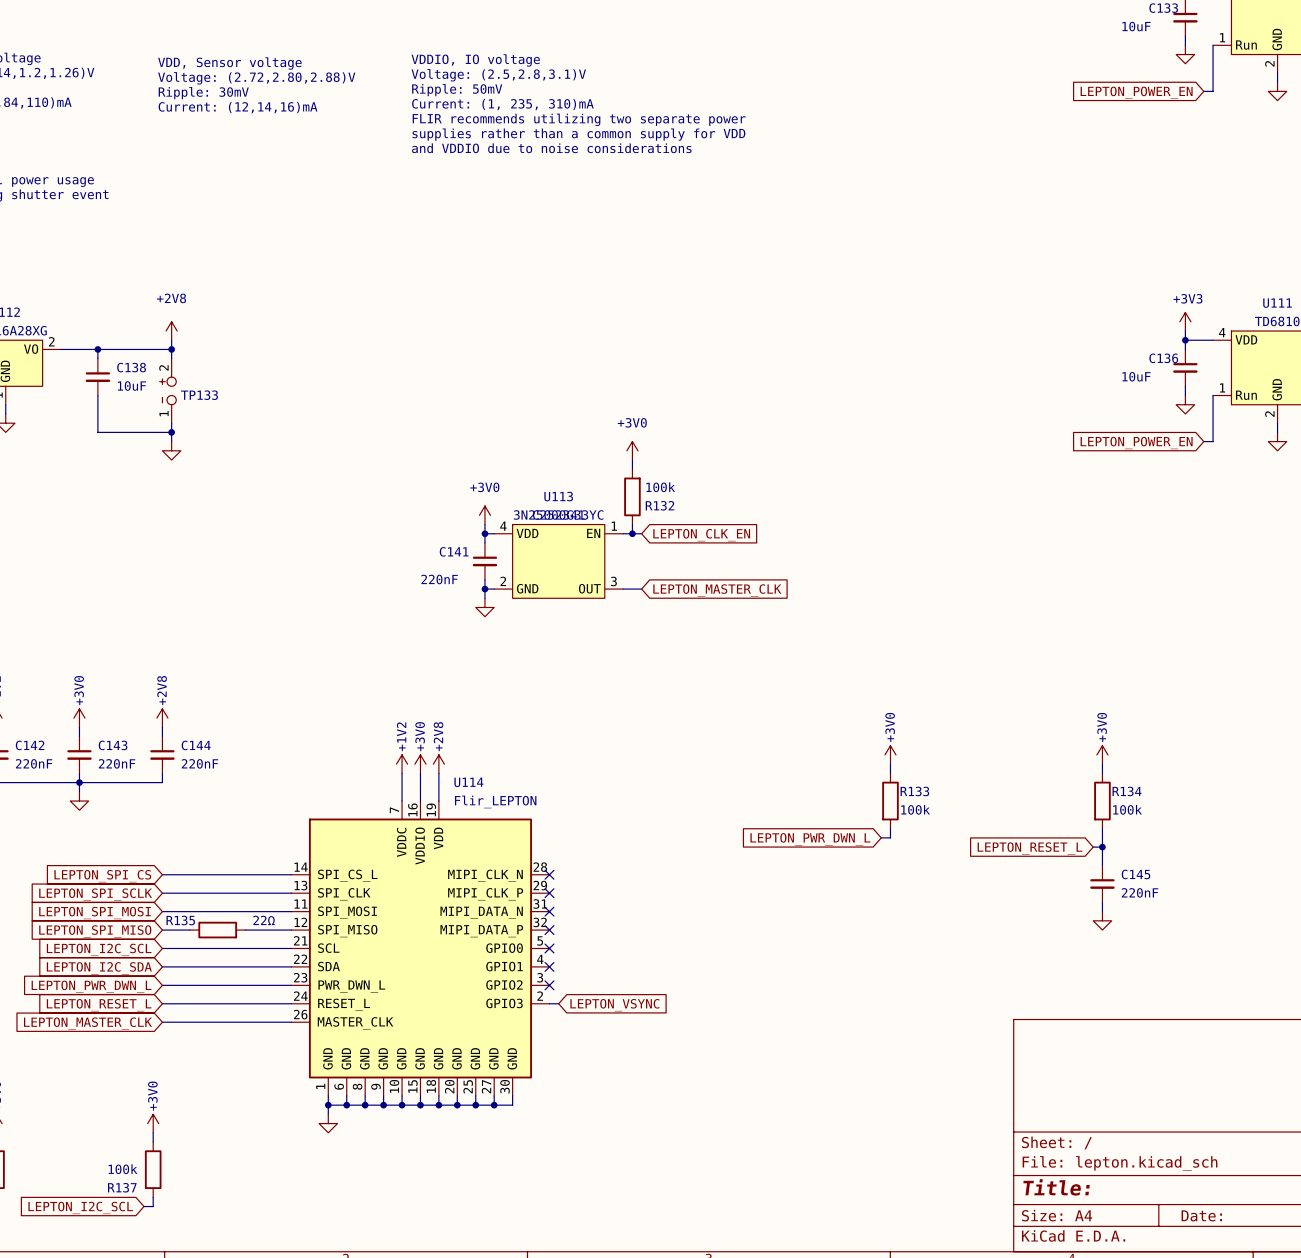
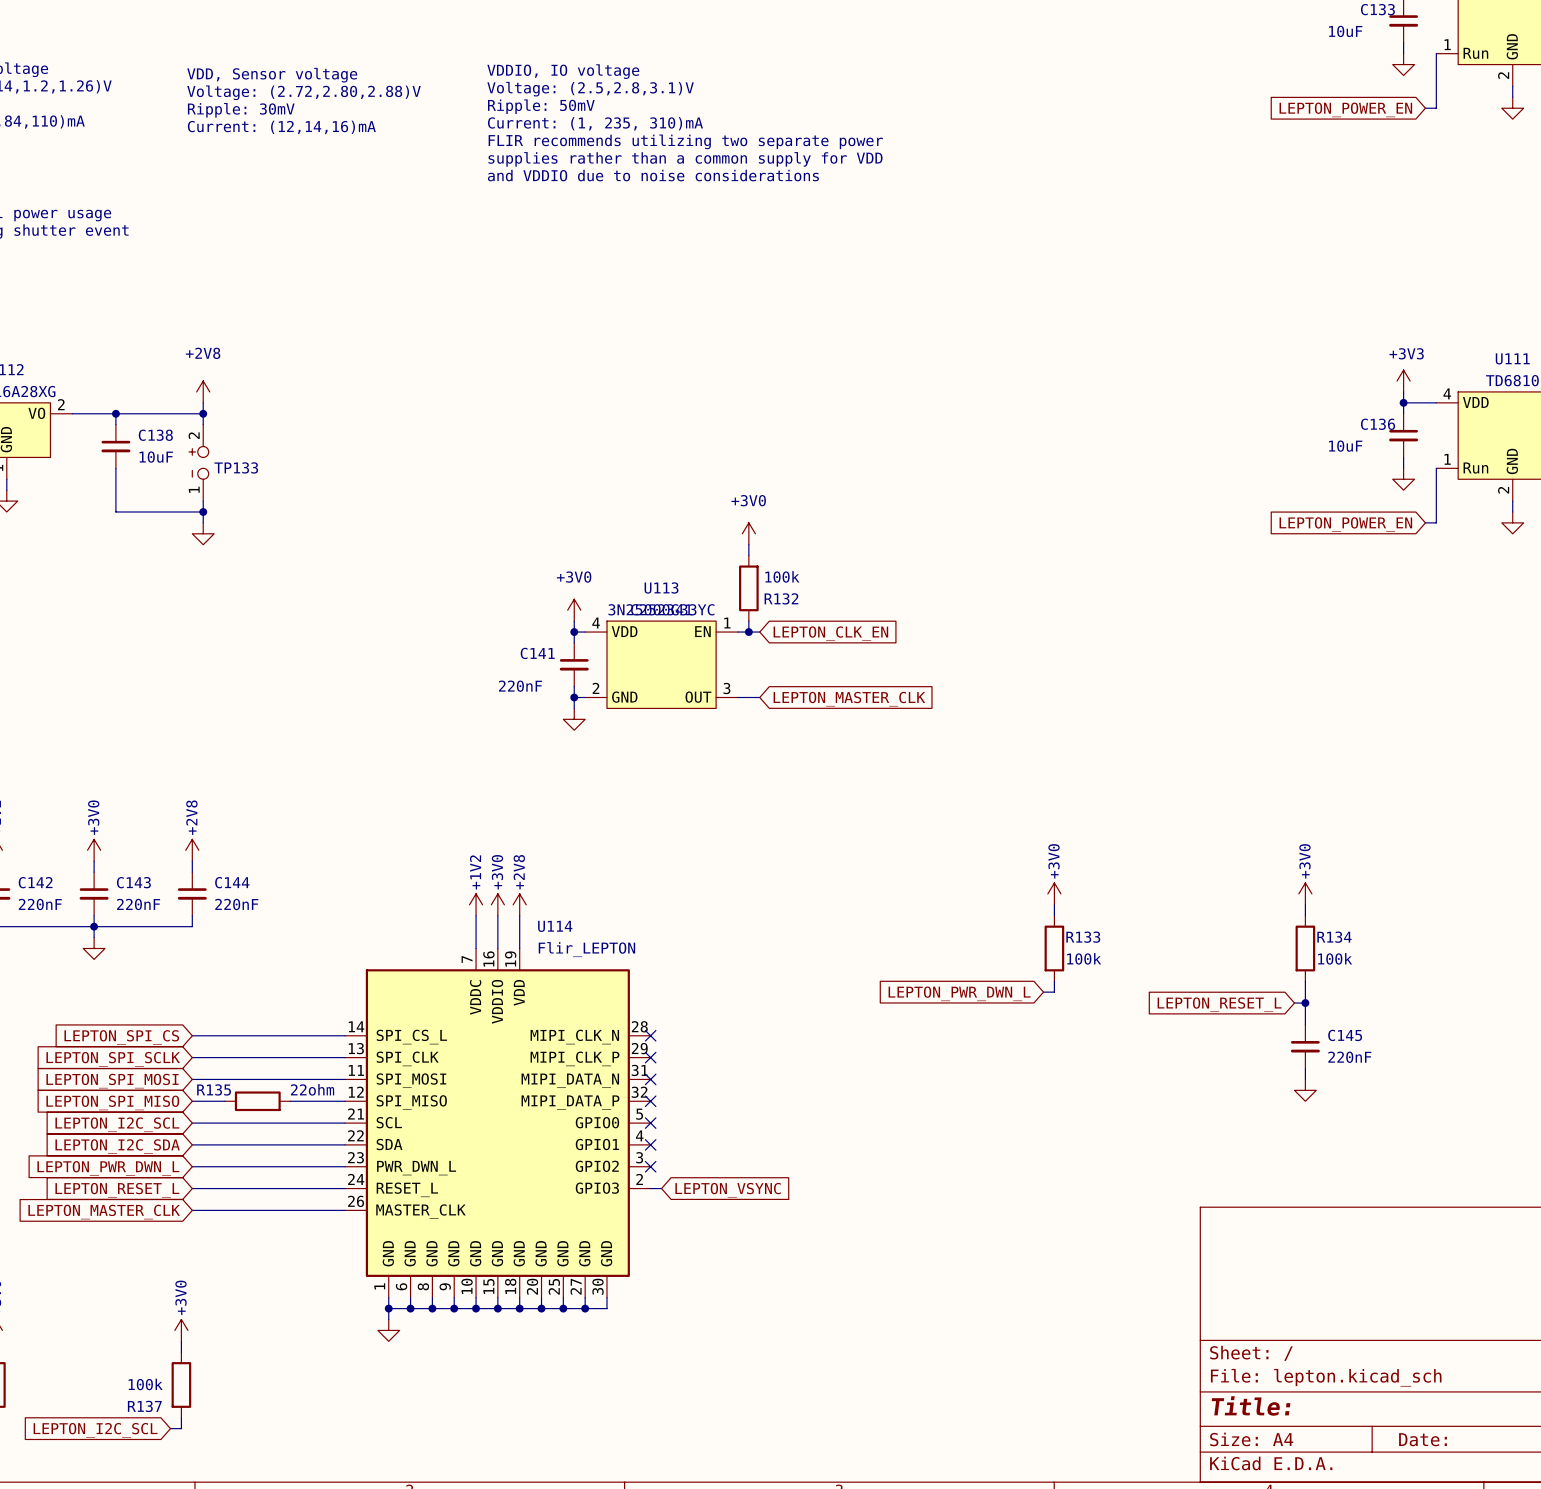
R135 value: 22Ω (264, 920) -> 22ohm (312, 1089)

